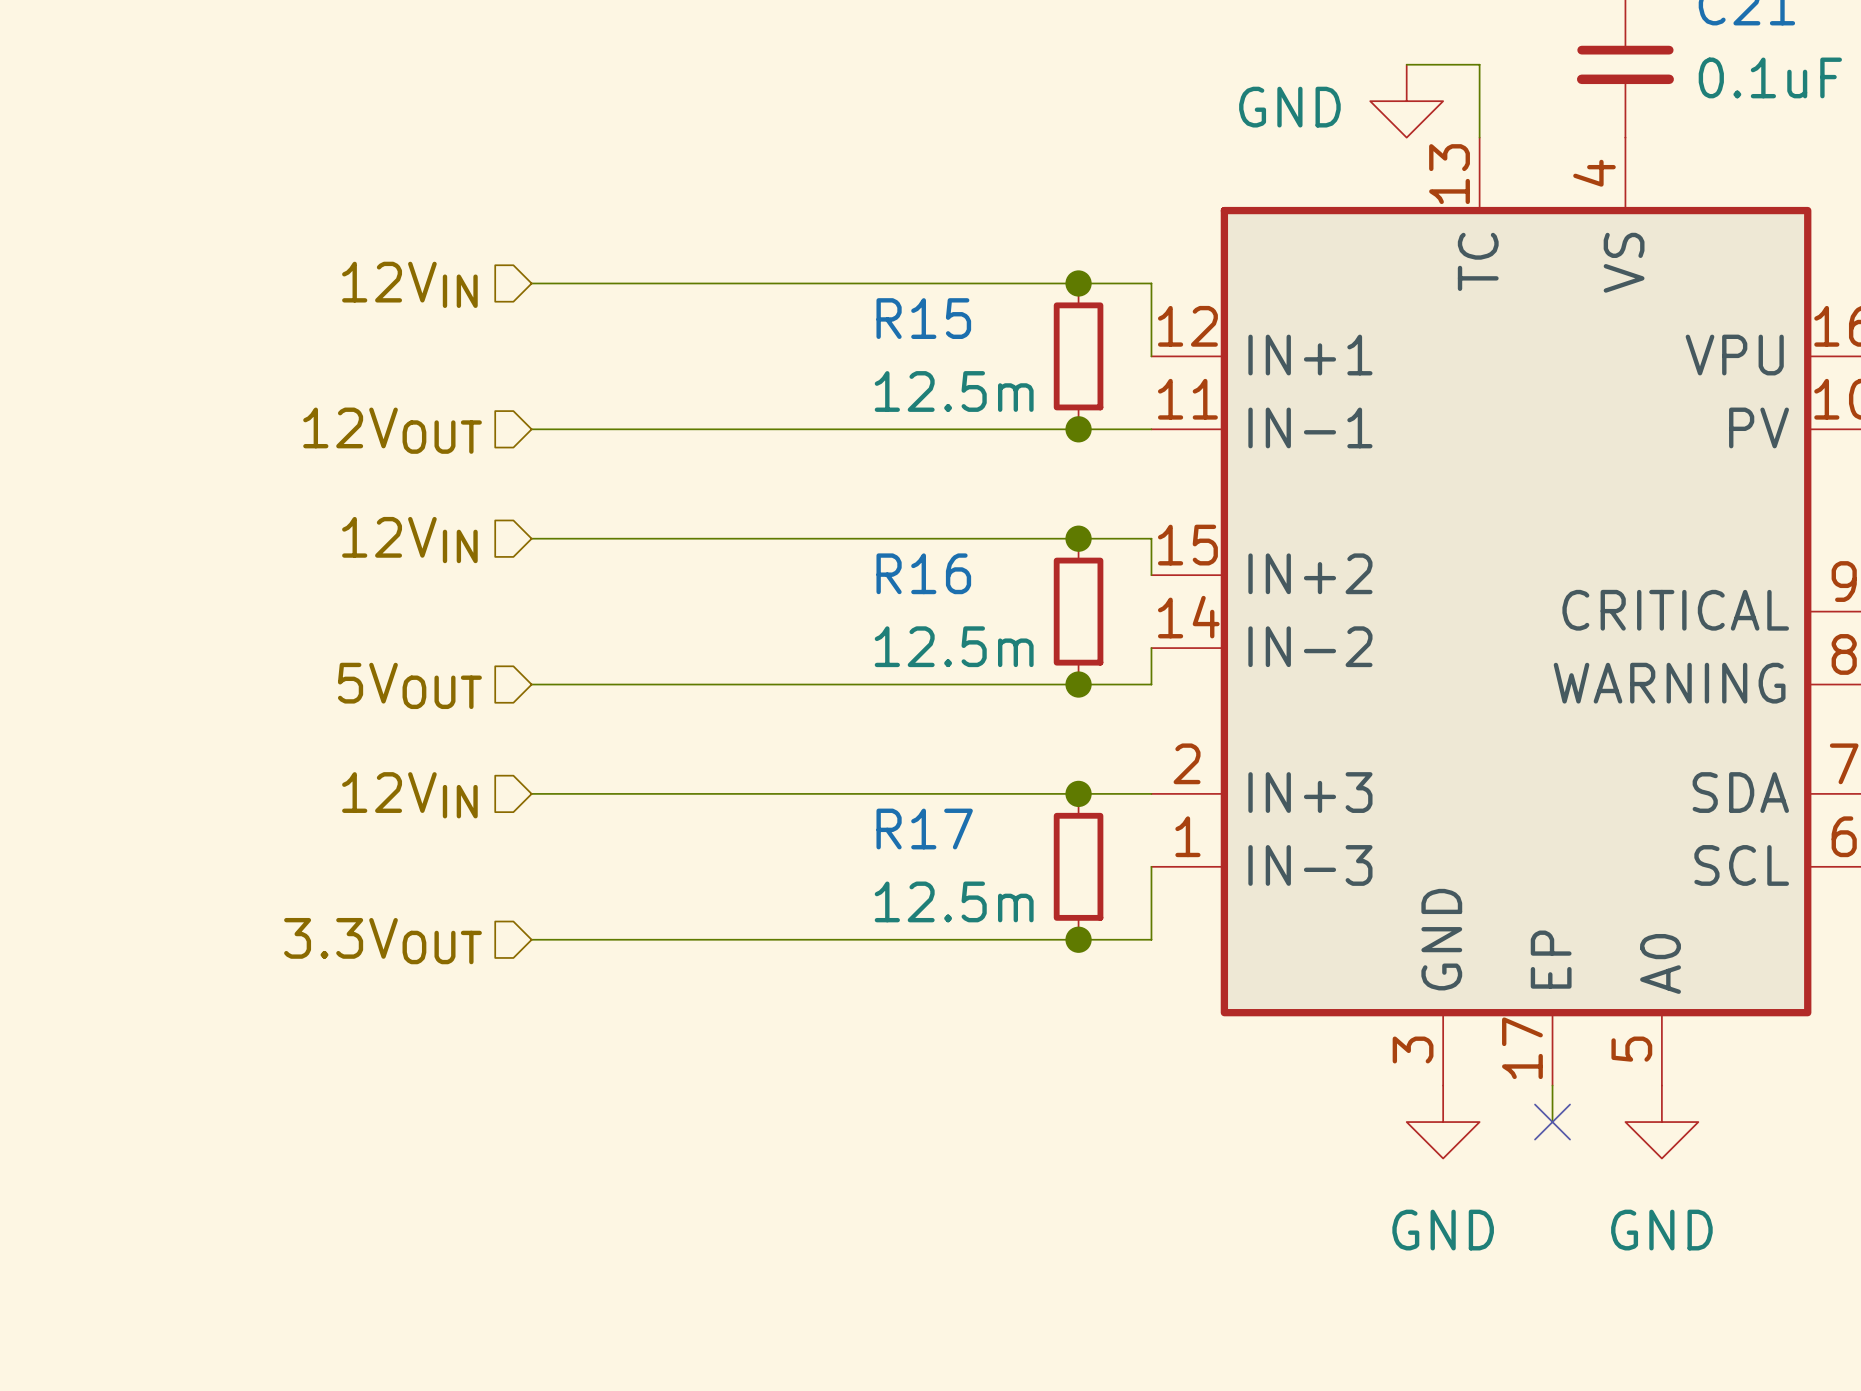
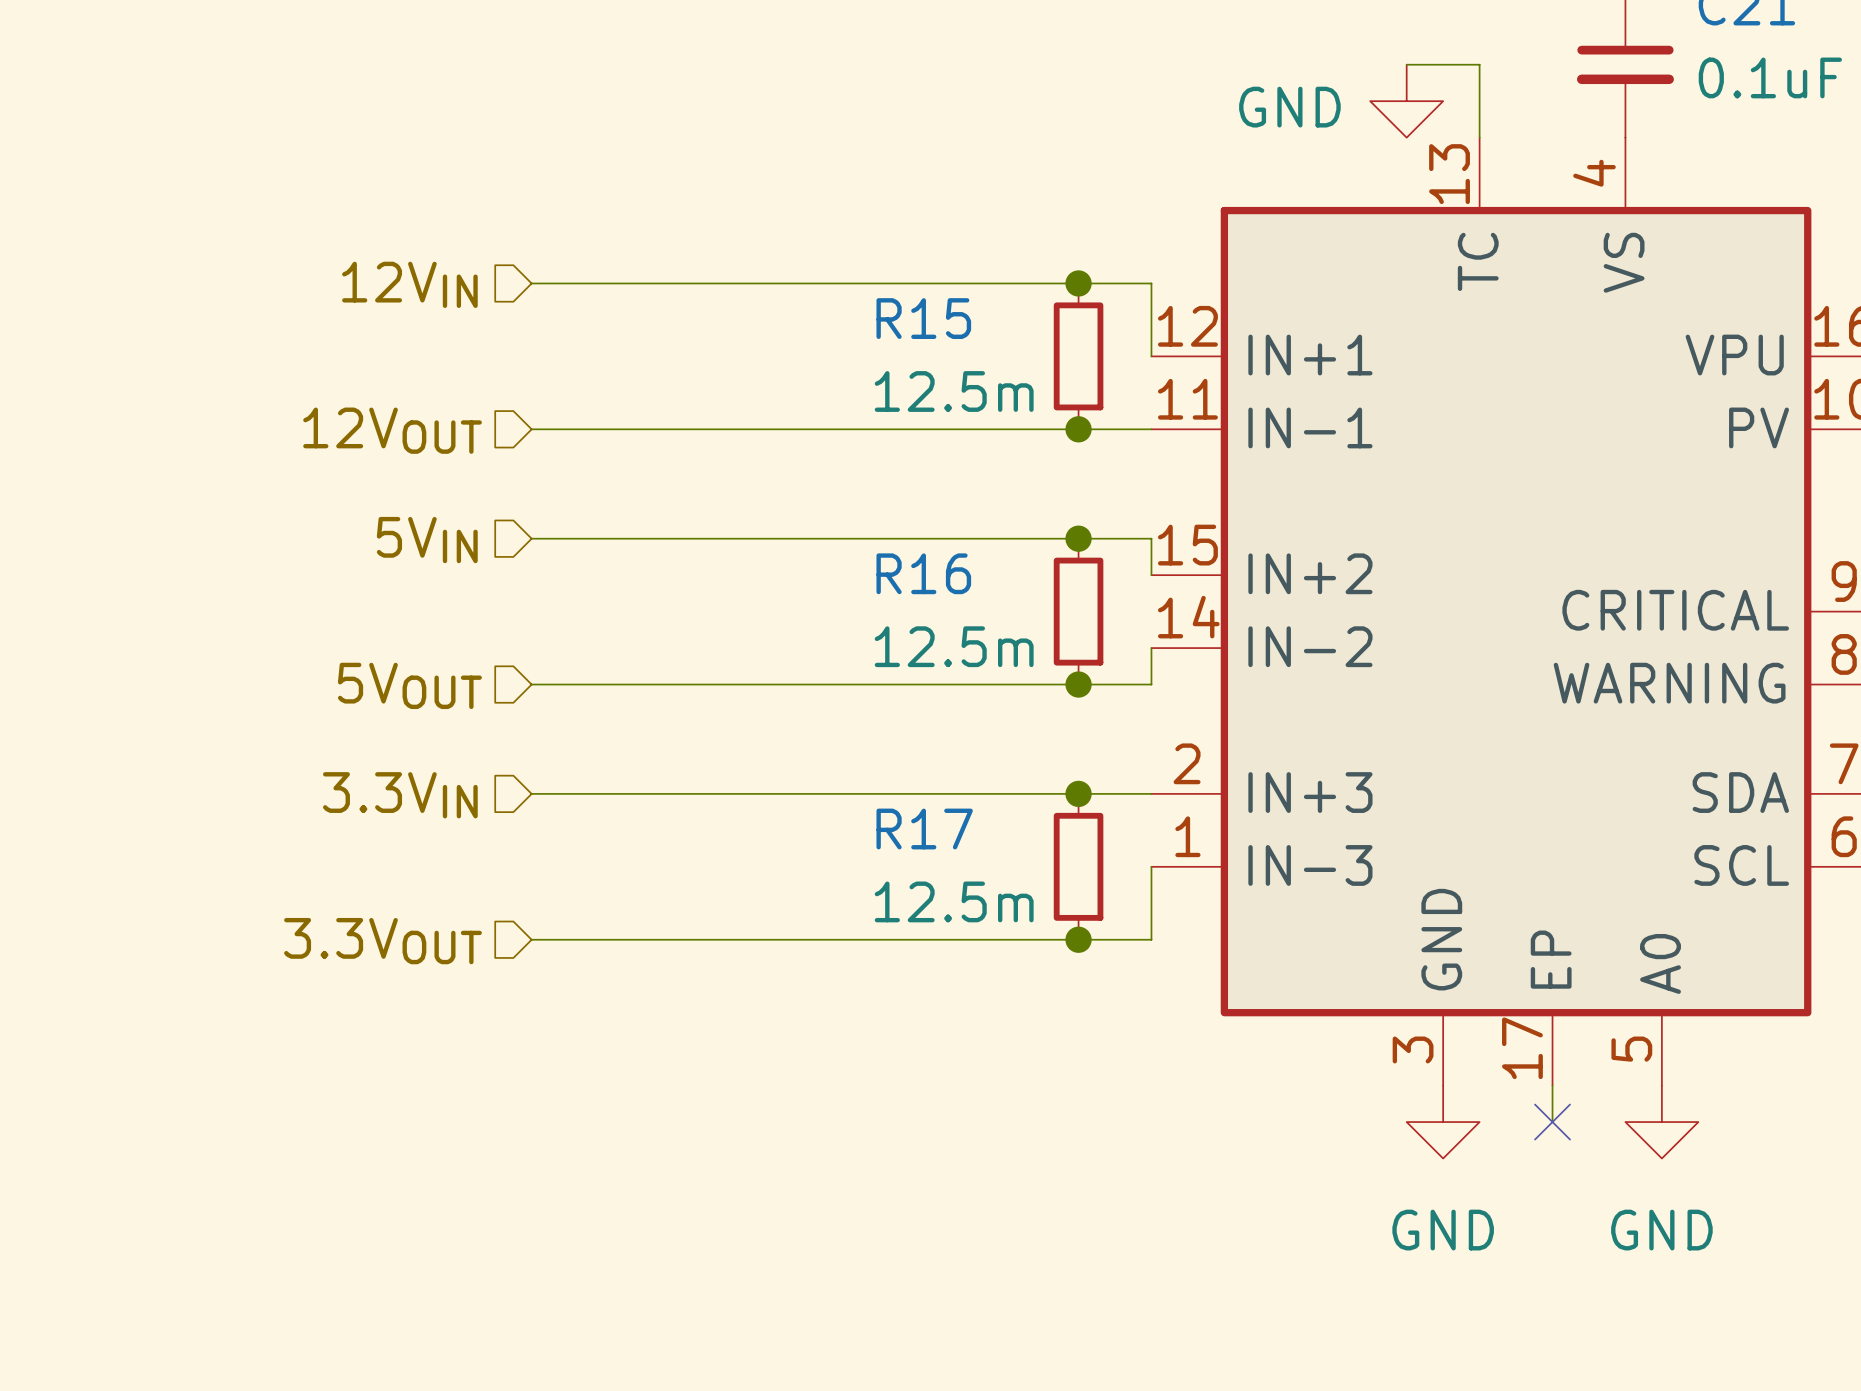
hierarchical label: 12VIN (409, 540) -> 5VIN (427, 540)
hierarchical label: 12VIN (409, 795) -> 3.3VIN (400, 795)

